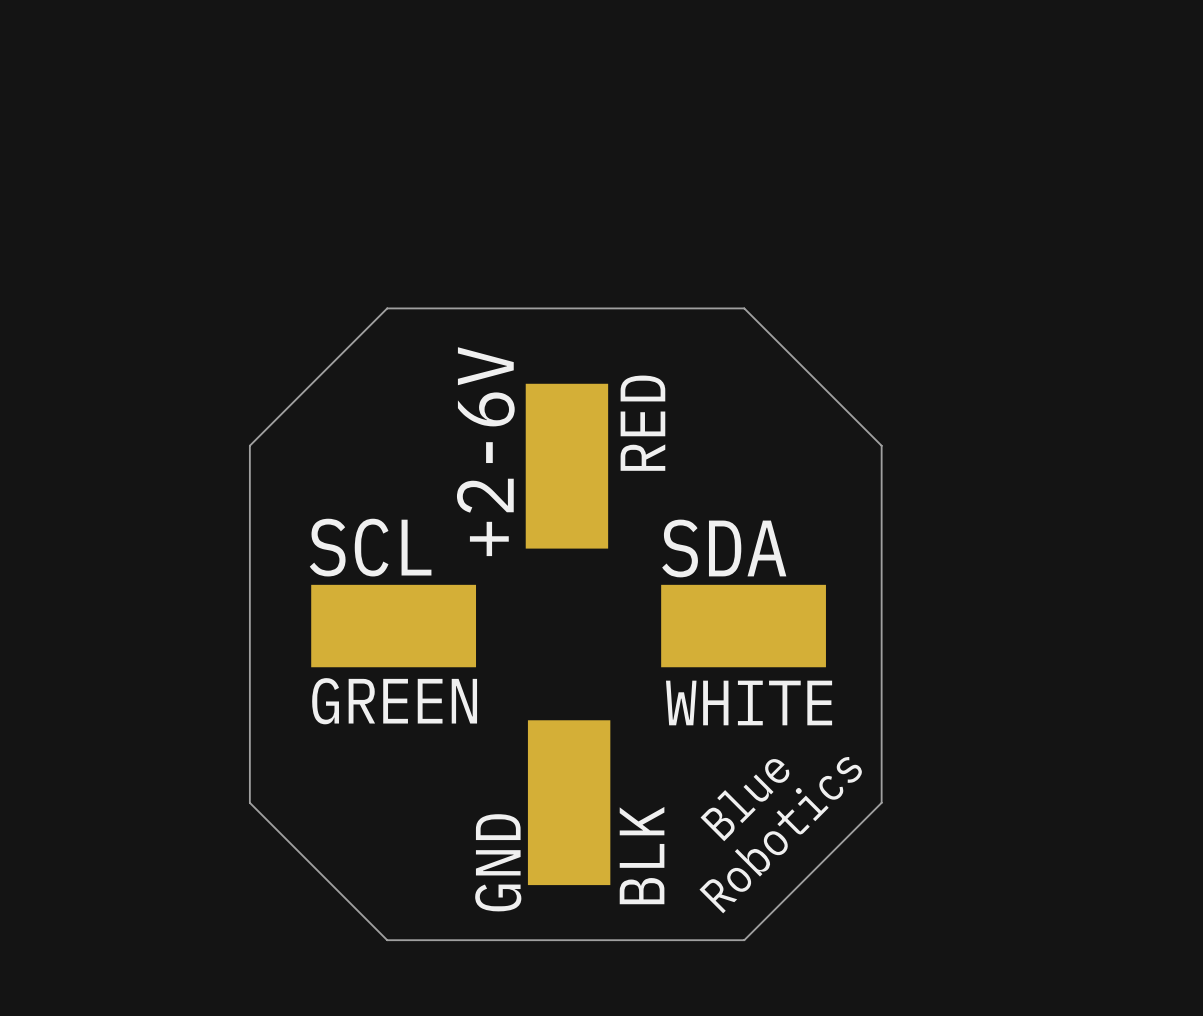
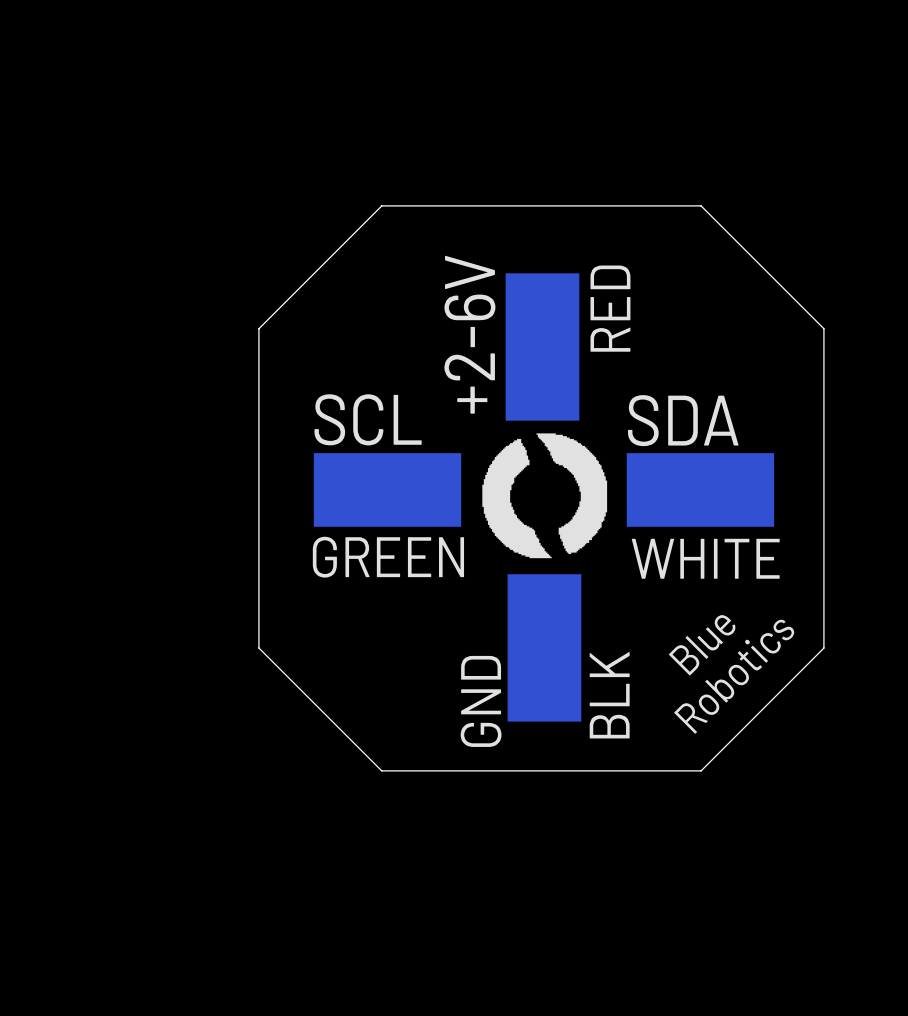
drawing: none -> [482, 433, 608, 559]

